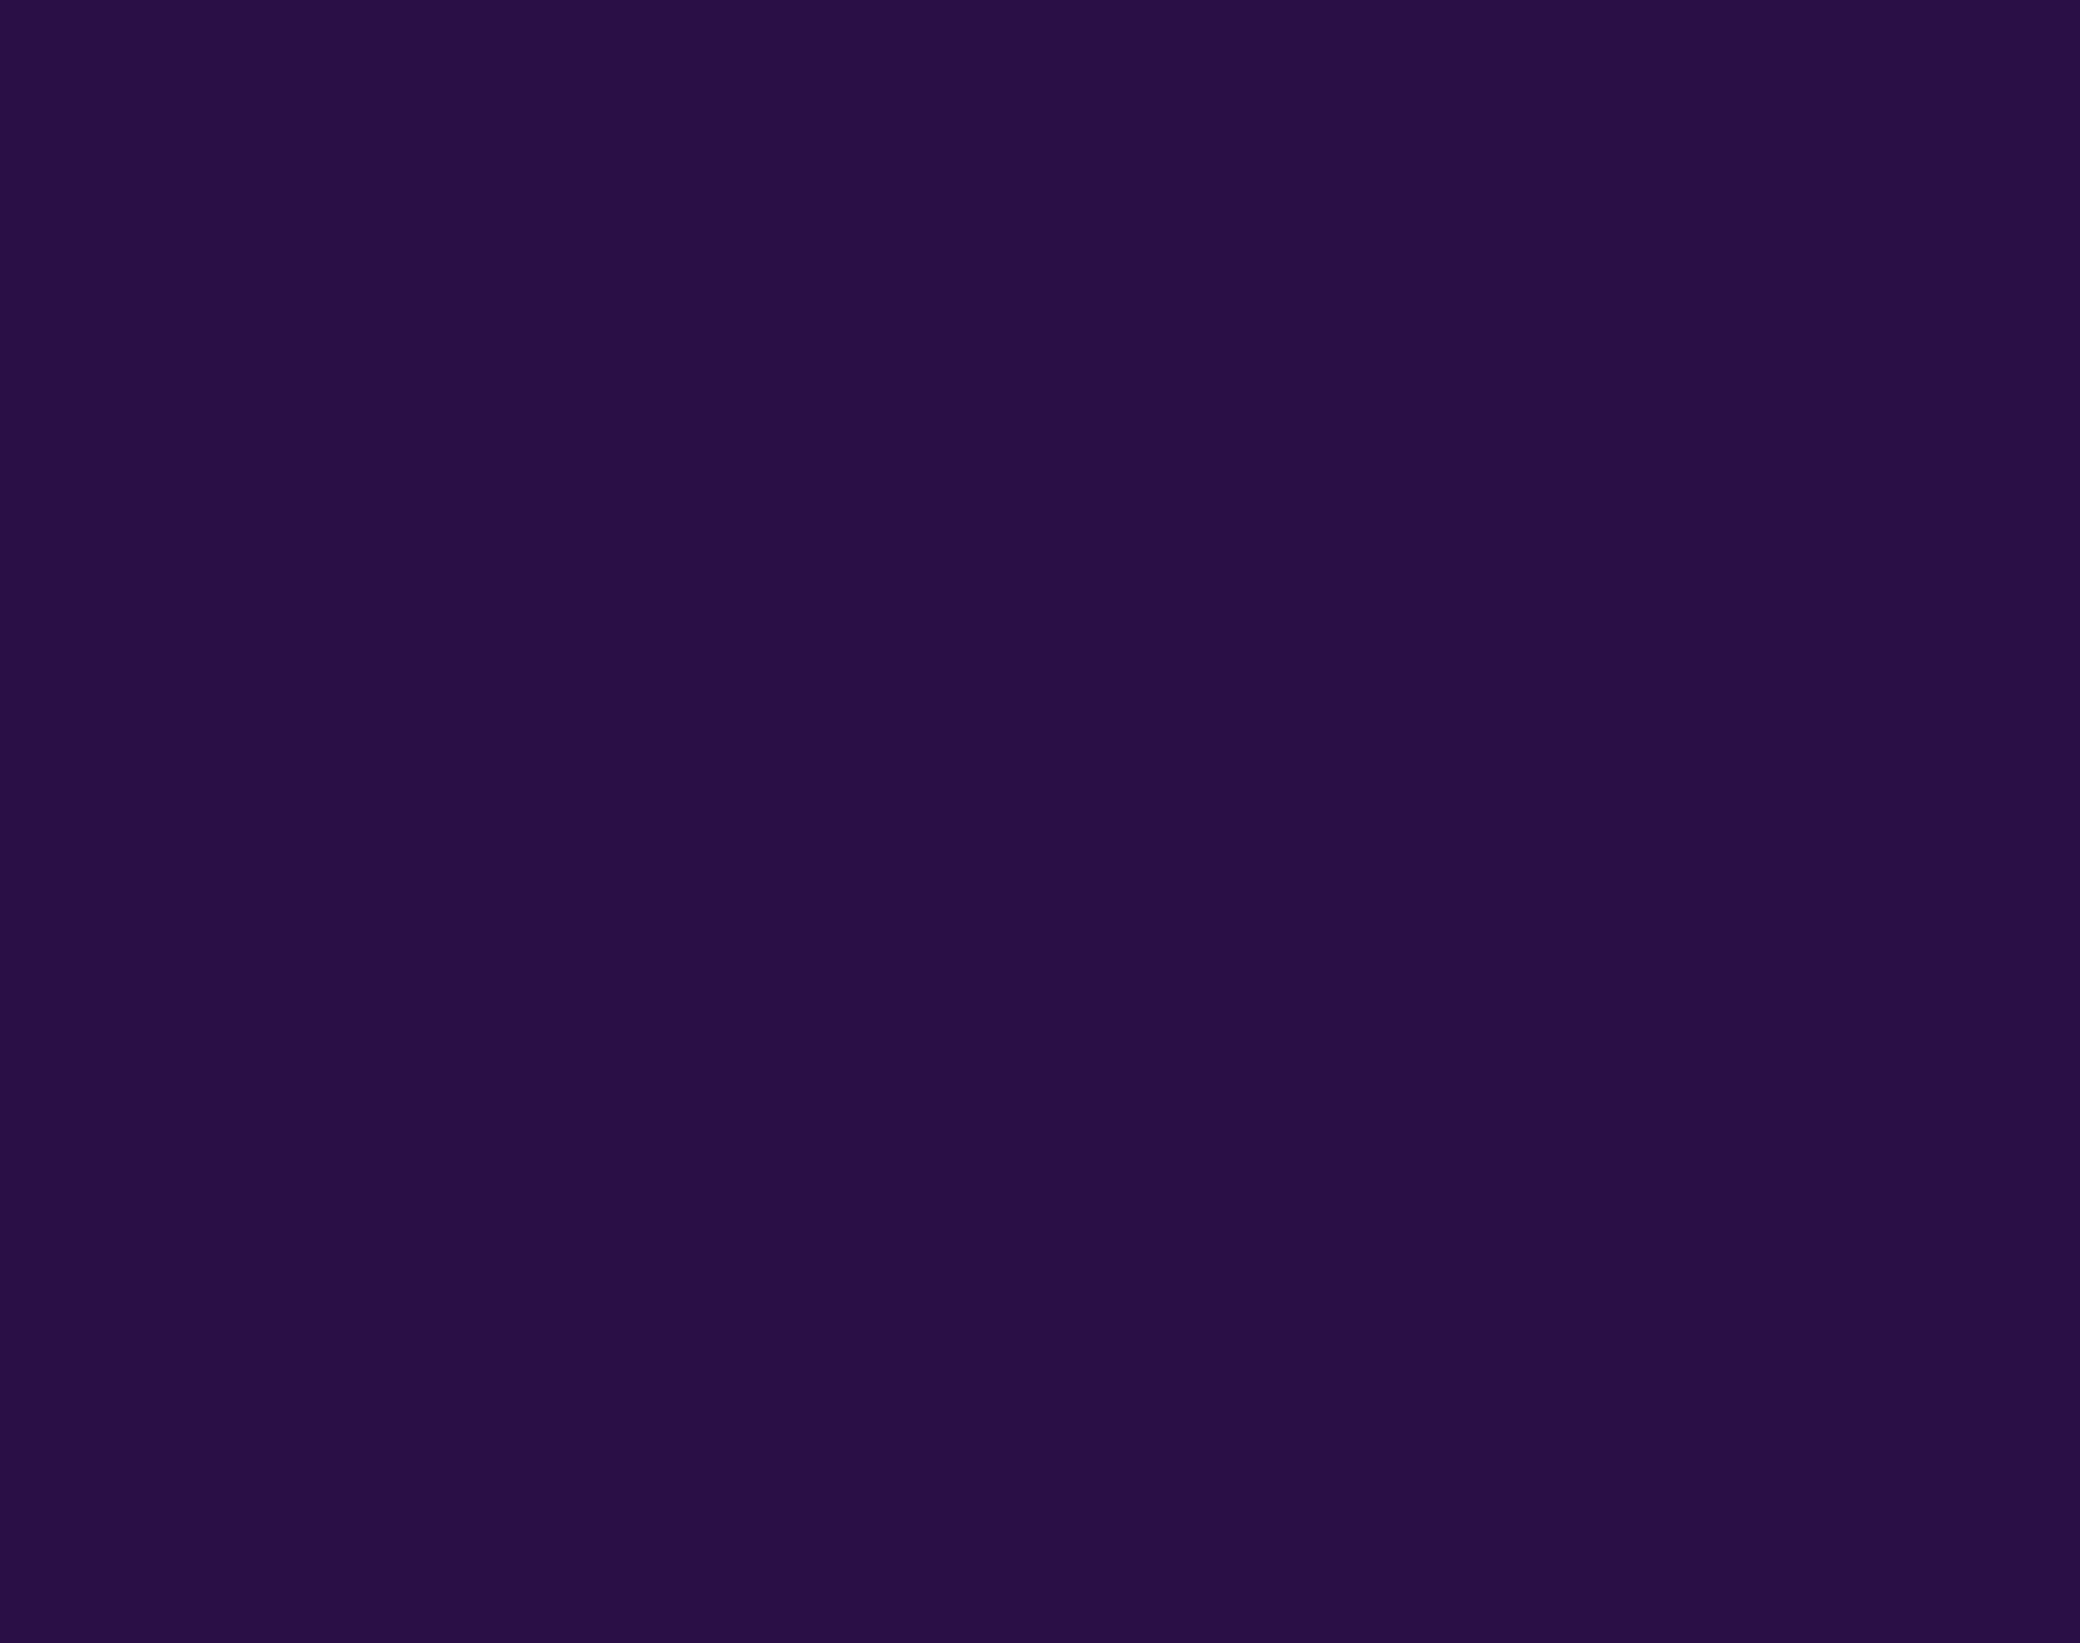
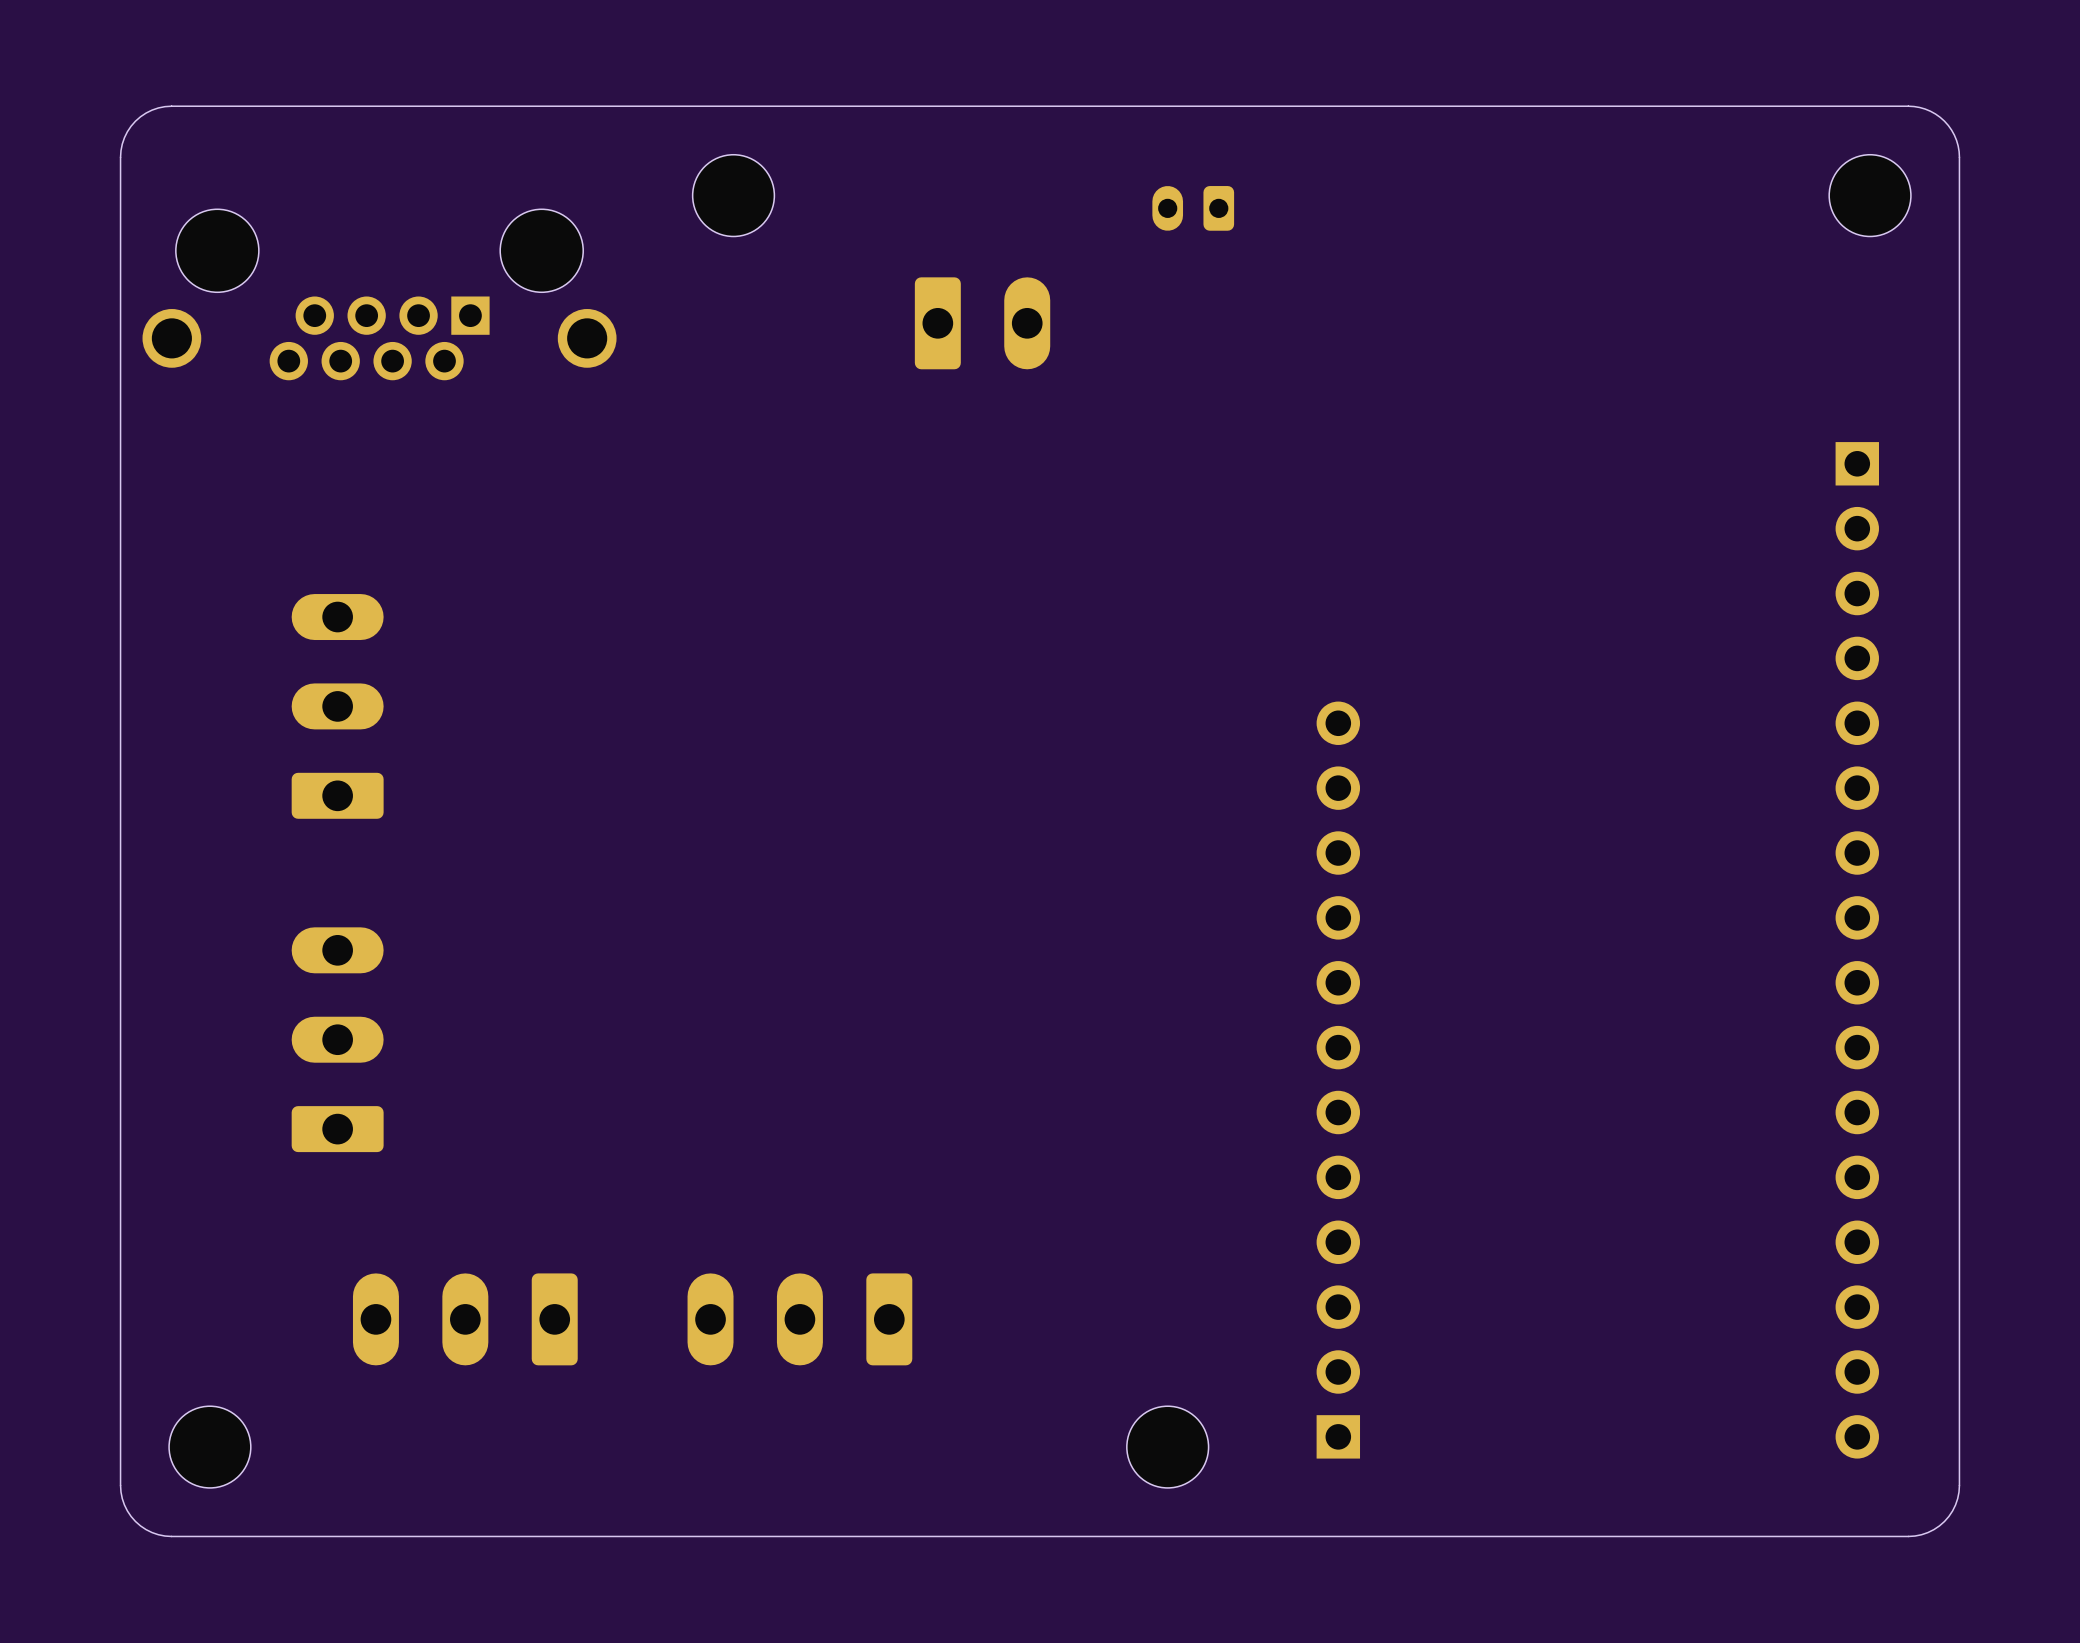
board edge: none -> (1908, 106) (171, 106) (152, 110) (140, 116) (127, 131) (122, 144) (120, 157) (120, 1485) (122, 1498) (131, 1516) (146, 1529) (158, 1534) (171, 1536) (1908, 1536) (1927, 1532) (1939, 1525) (1948, 1516) (1955, 1504) (1959, 1485) (1959, 157) (1954, 135) (1944, 121) (1930, 111) (1908, 106)
part: none -> (733, 195)
part: none -> (1870, 195)
part: none -> (1193, 208)
part: none -> (379, 294)
part: none -> (982, 323)
part: none -> (337, 706)
part: none -> (1857, 950)
part: none -> (337, 1039)
part: none -> (1338, 1080)
part: none -> (465, 1319)
part: none -> (799, 1319)
part: none -> (209, 1447)
part: none -> (1167, 1447)

